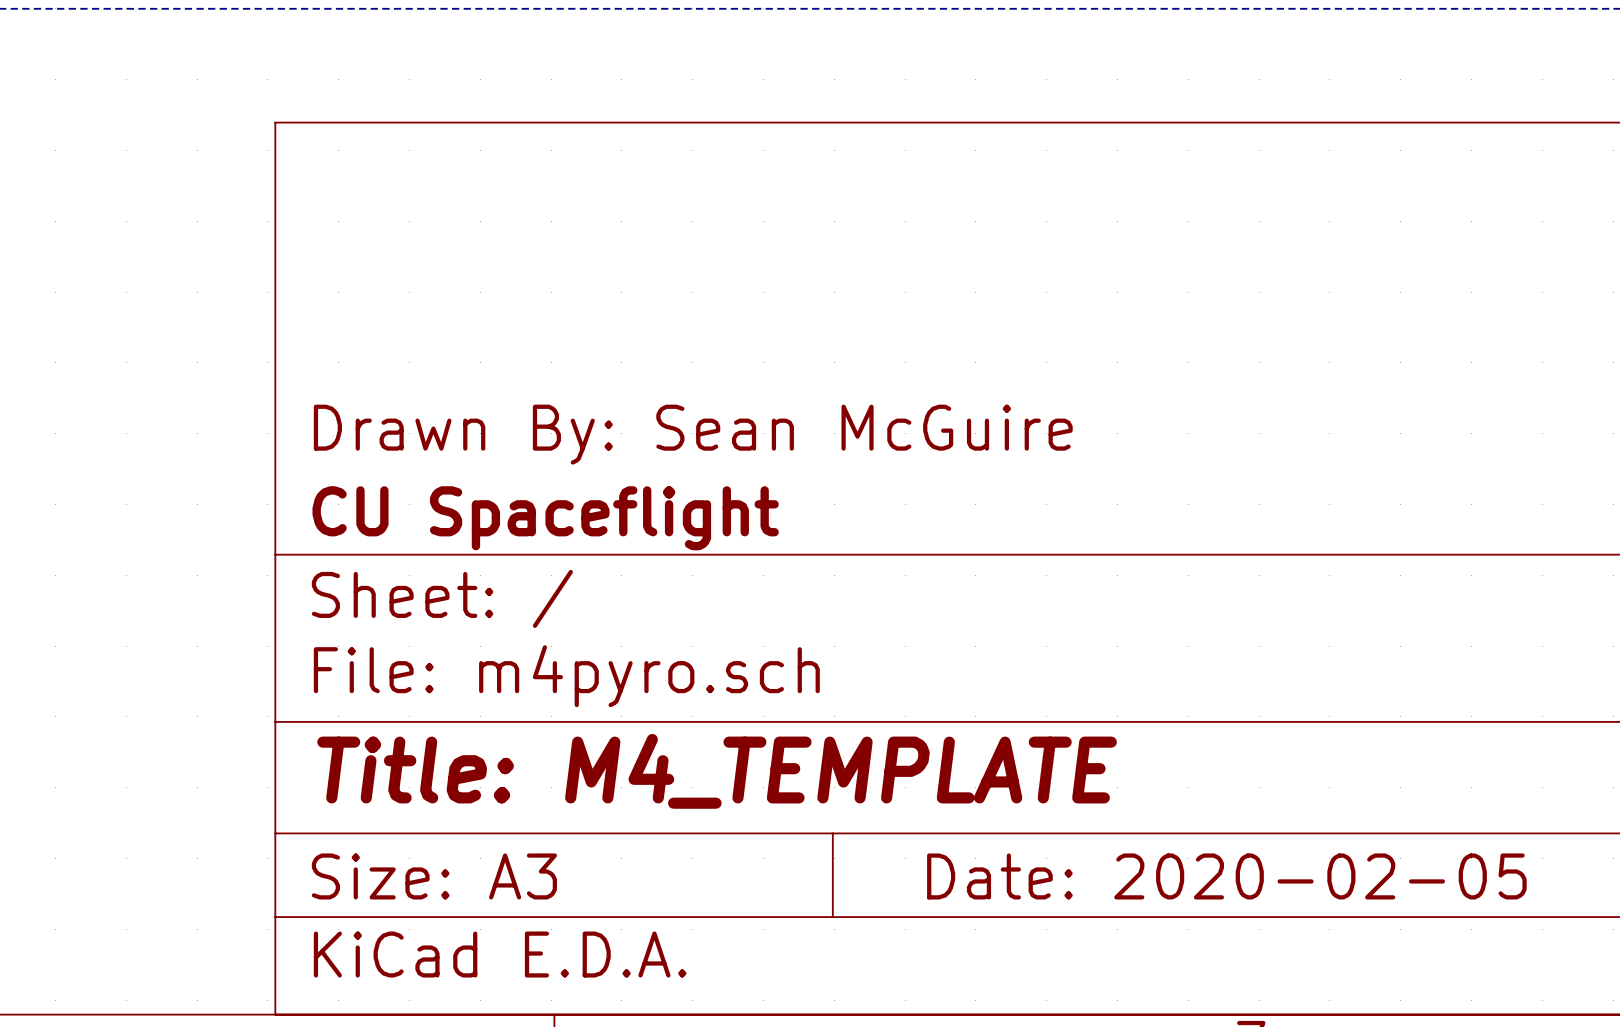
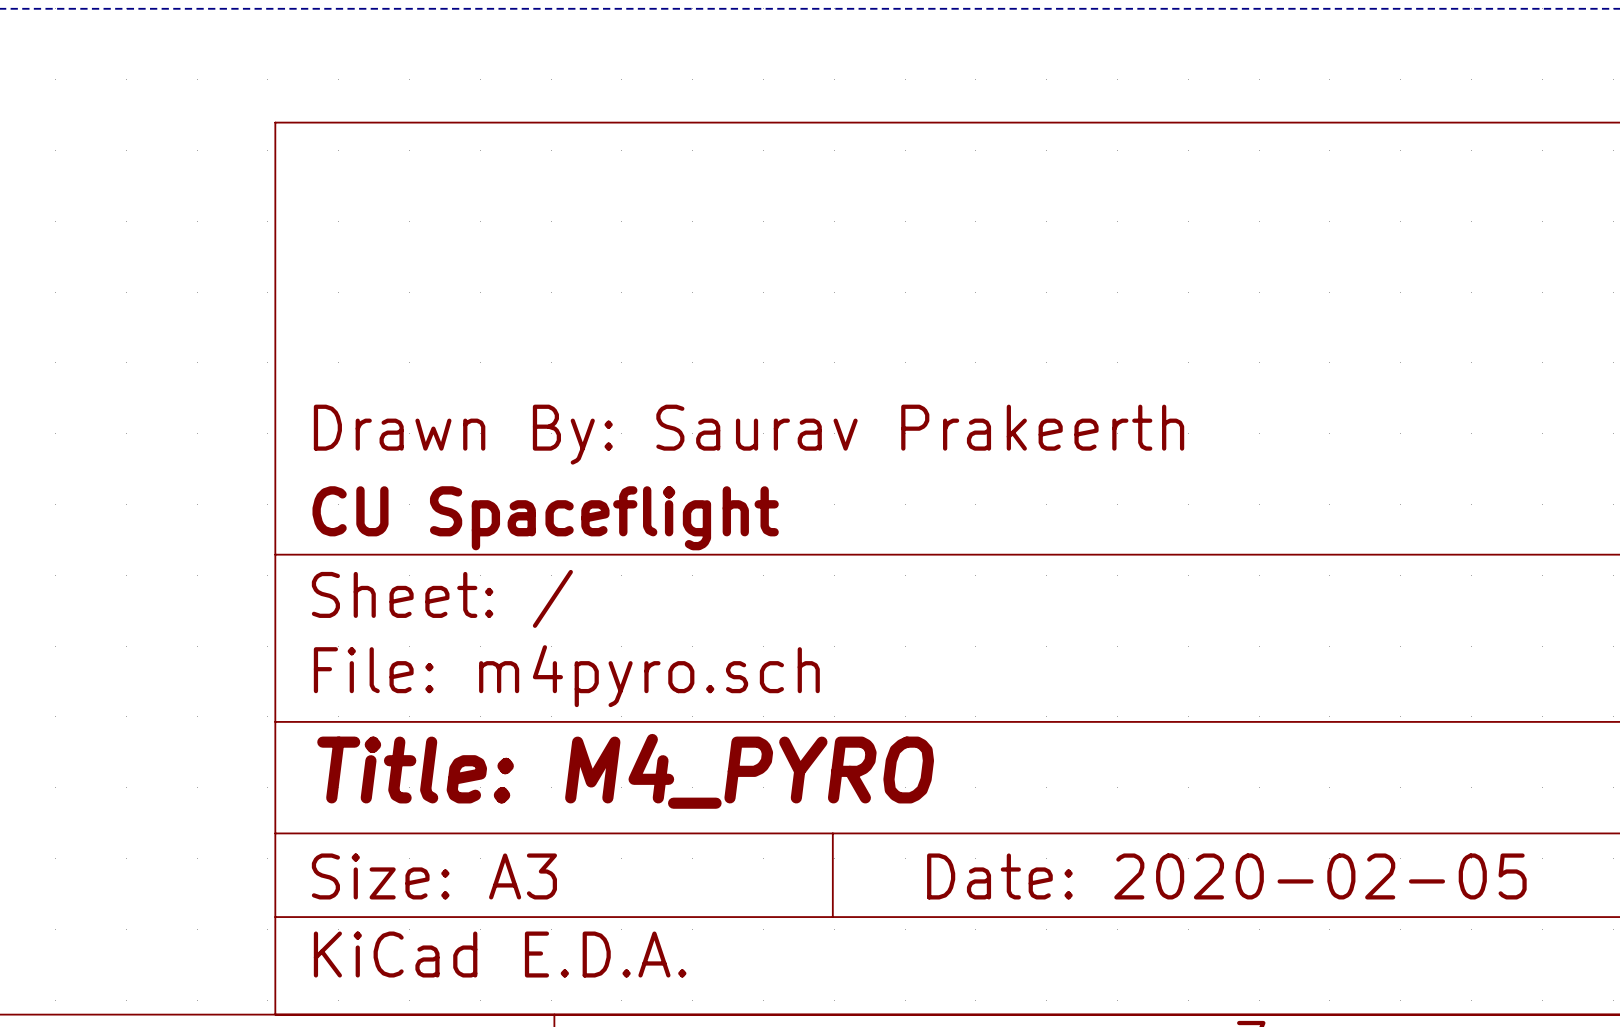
title block: Drawn By: Sean McGuire (693, 434) -> Drawn By: Saurav Prakeerth (749, 434)
title block: Title: M4_TEMPLATE (717, 771) -> Title: M4_PYRO (625, 771)

